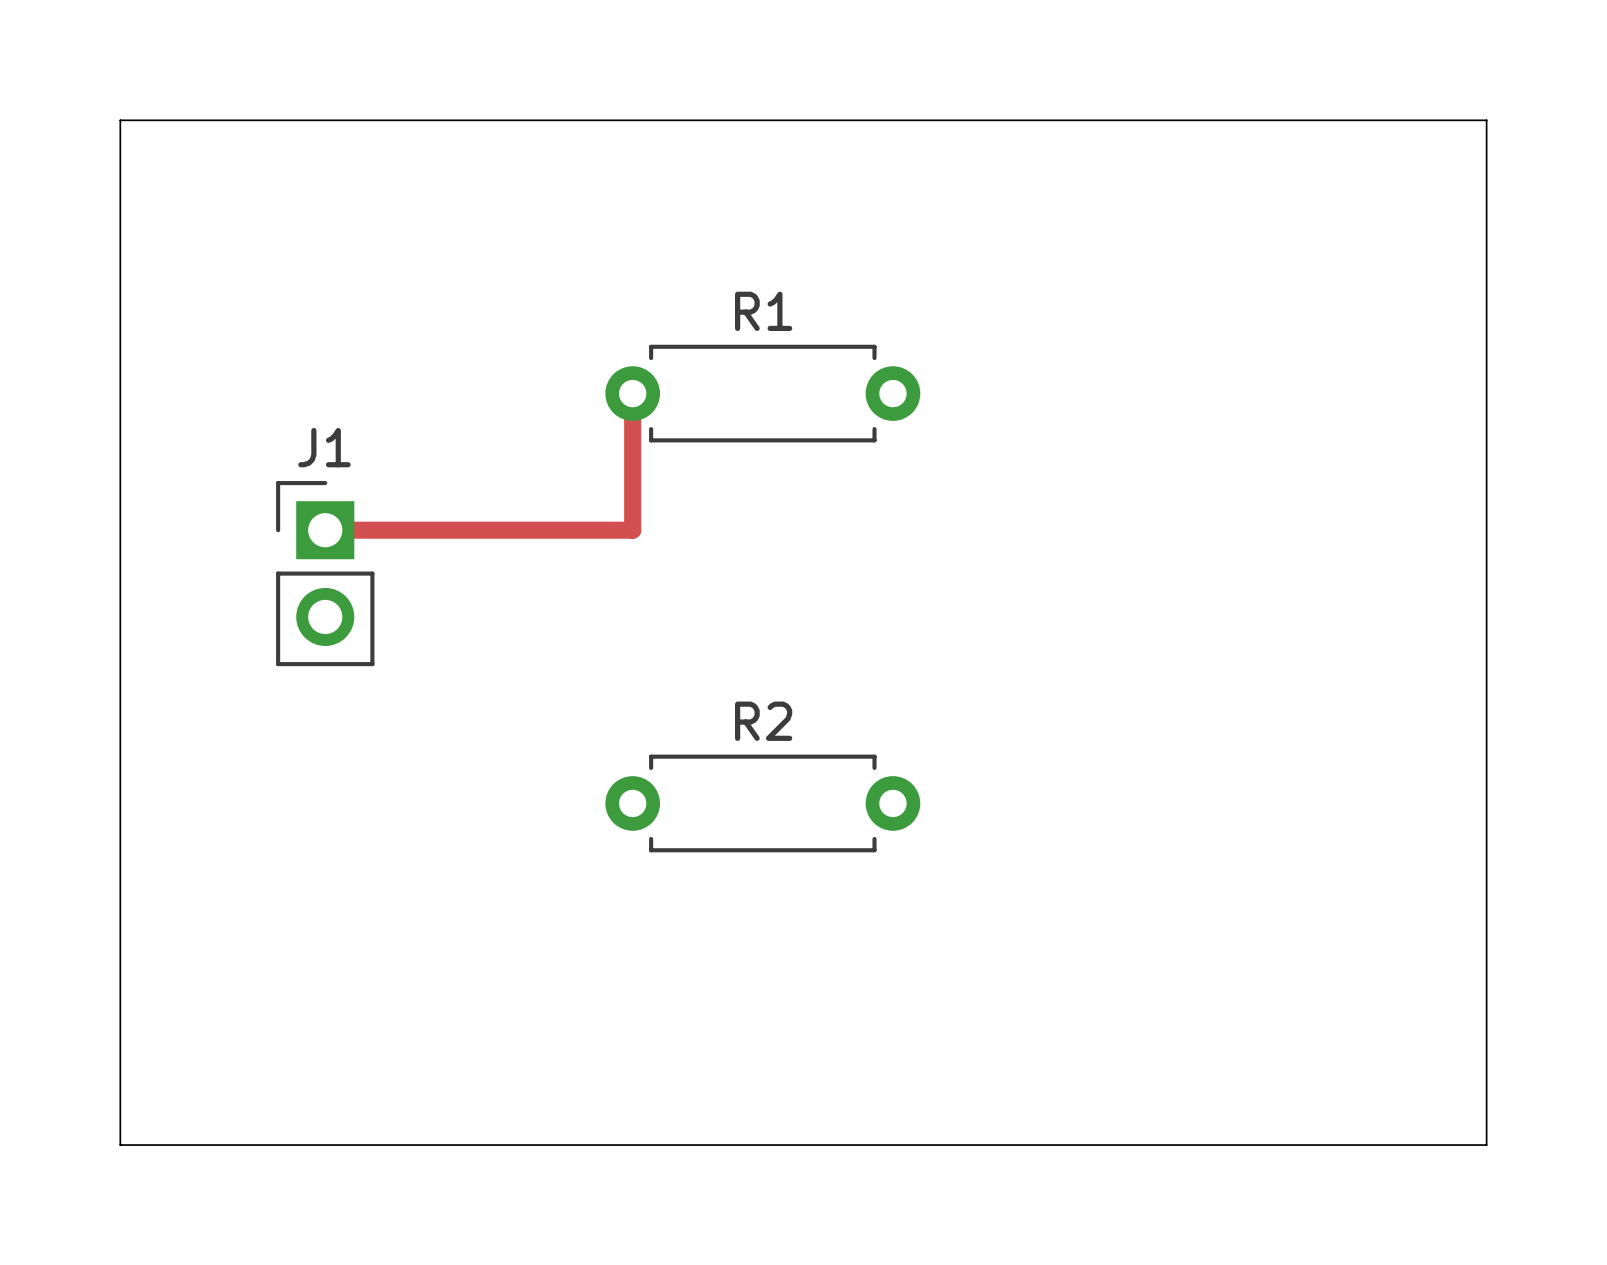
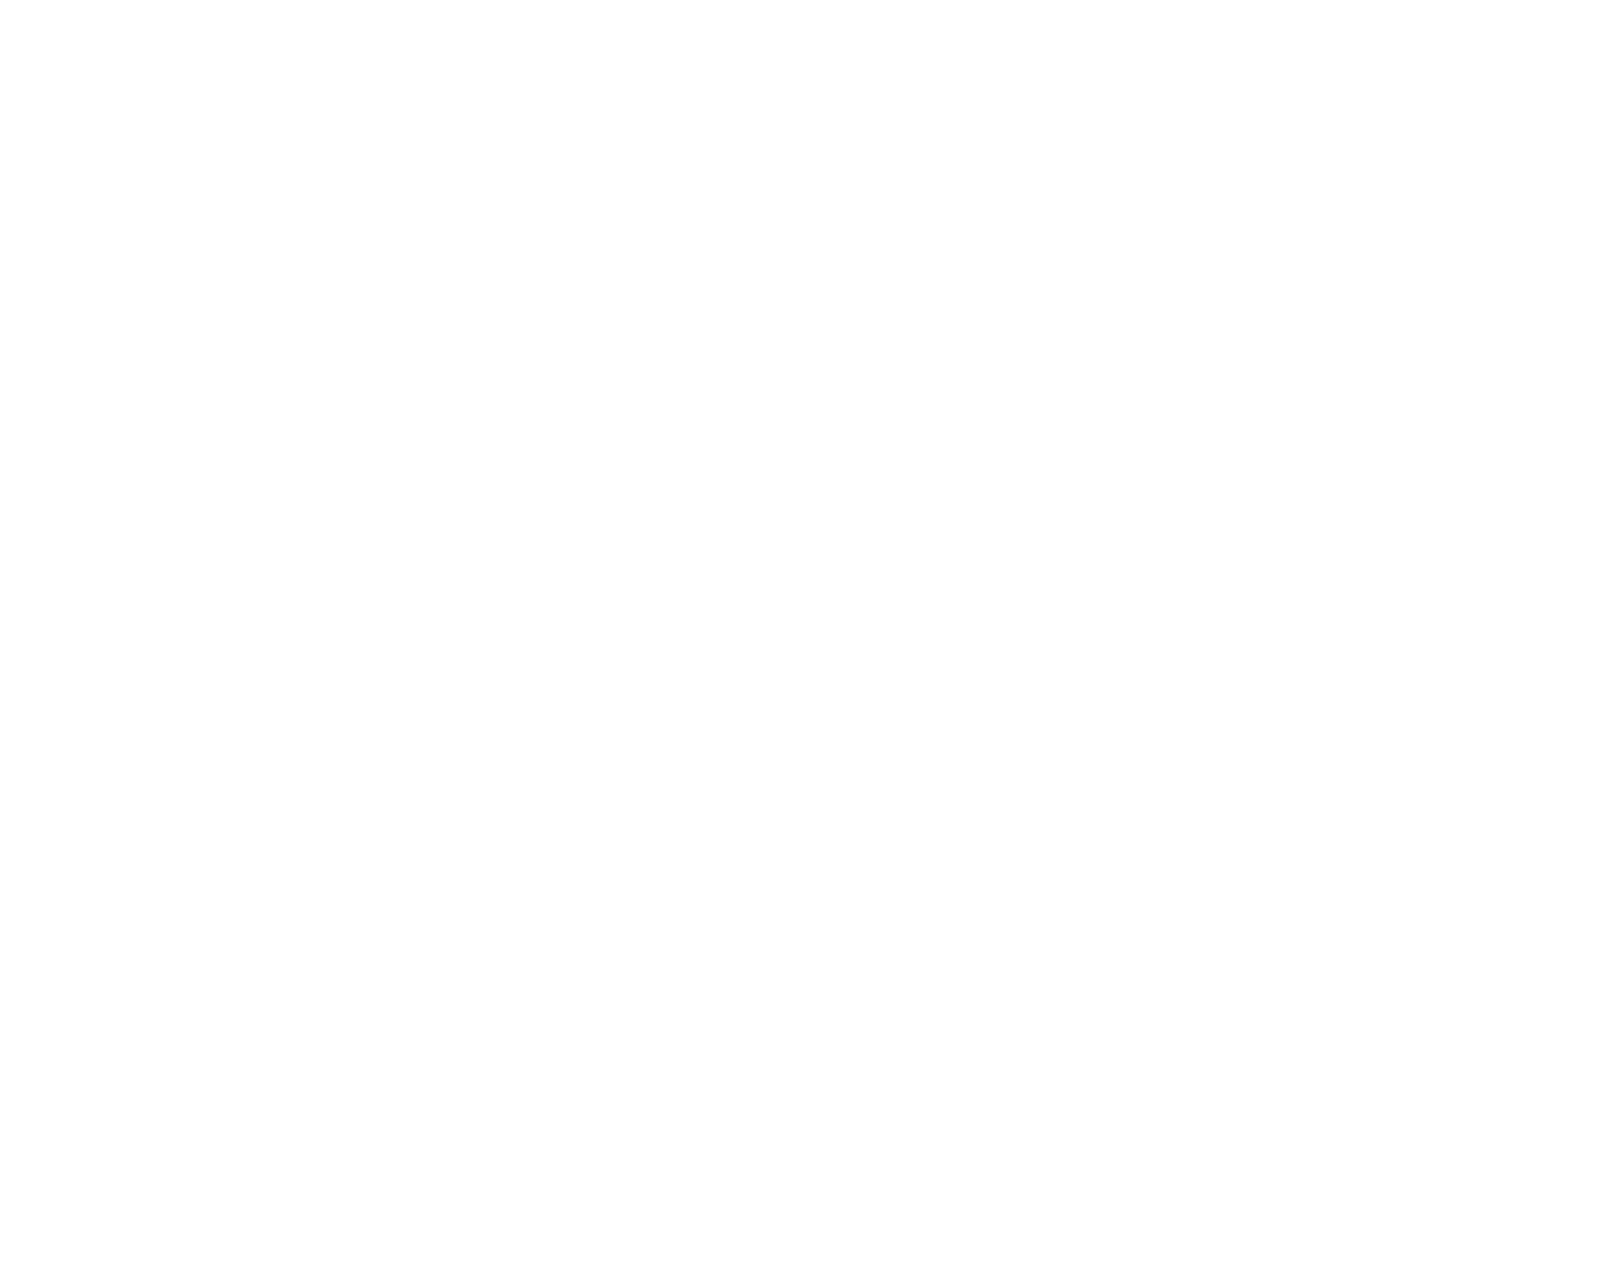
board edge: (120, 120) (1486, 120) (1486, 1145) (120, 1145) (120, 120) -> none
top track: (632, 393) (632, 530) (325, 530) -> none
R1: (762, 393) -> none
J1: (325, 573) -> none
R2: (762, 803) -> none

